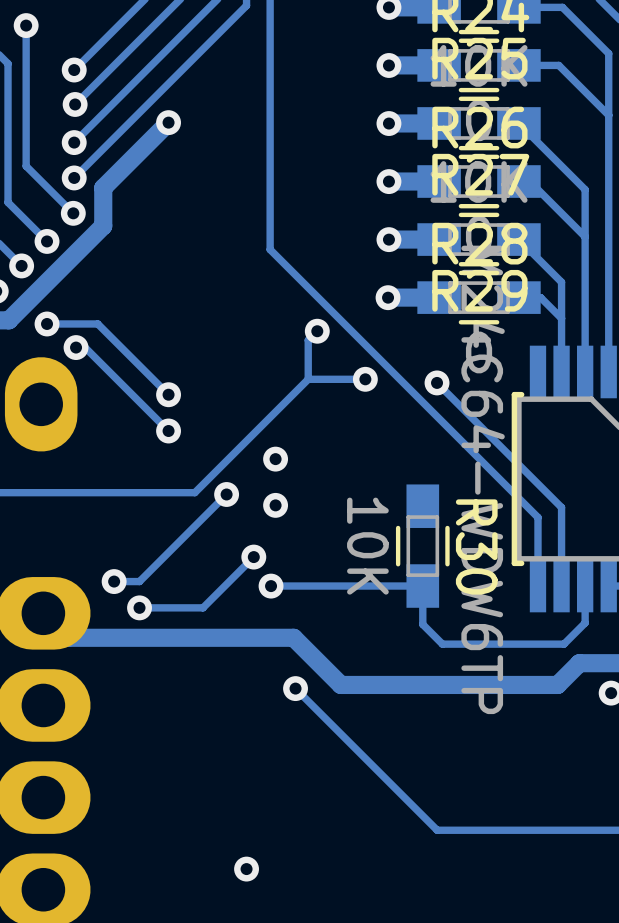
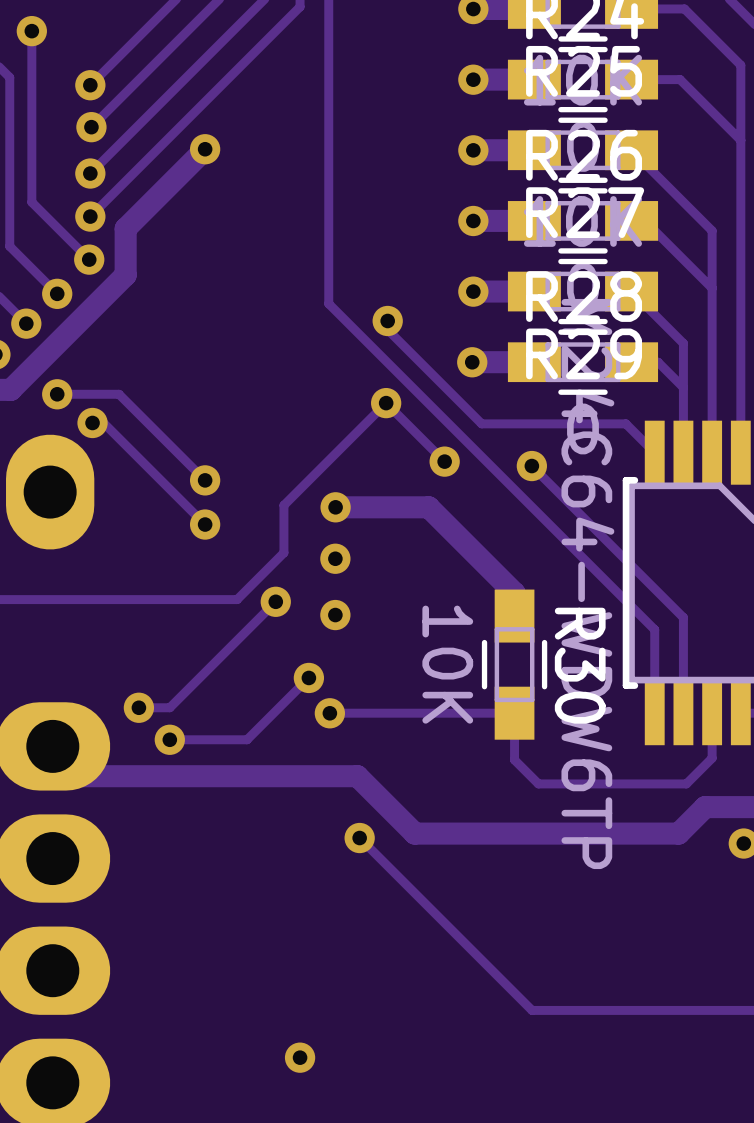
track: none -> (387, 320) (387, 329) (481, 423) (625, 423) (654, 452)
via: none -> (387, 320)
track: (308, 340) (308, 379) -> none
track: (308, 379) (233, 454) -> (375, 414) (283, 505) (283, 552)
track: (365, 379) (308, 379) -> (444, 461) (386, 403)
track: none -> (335, 507) (428, 507) (514, 593) (514, 616)
via: none -> (335, 507)

